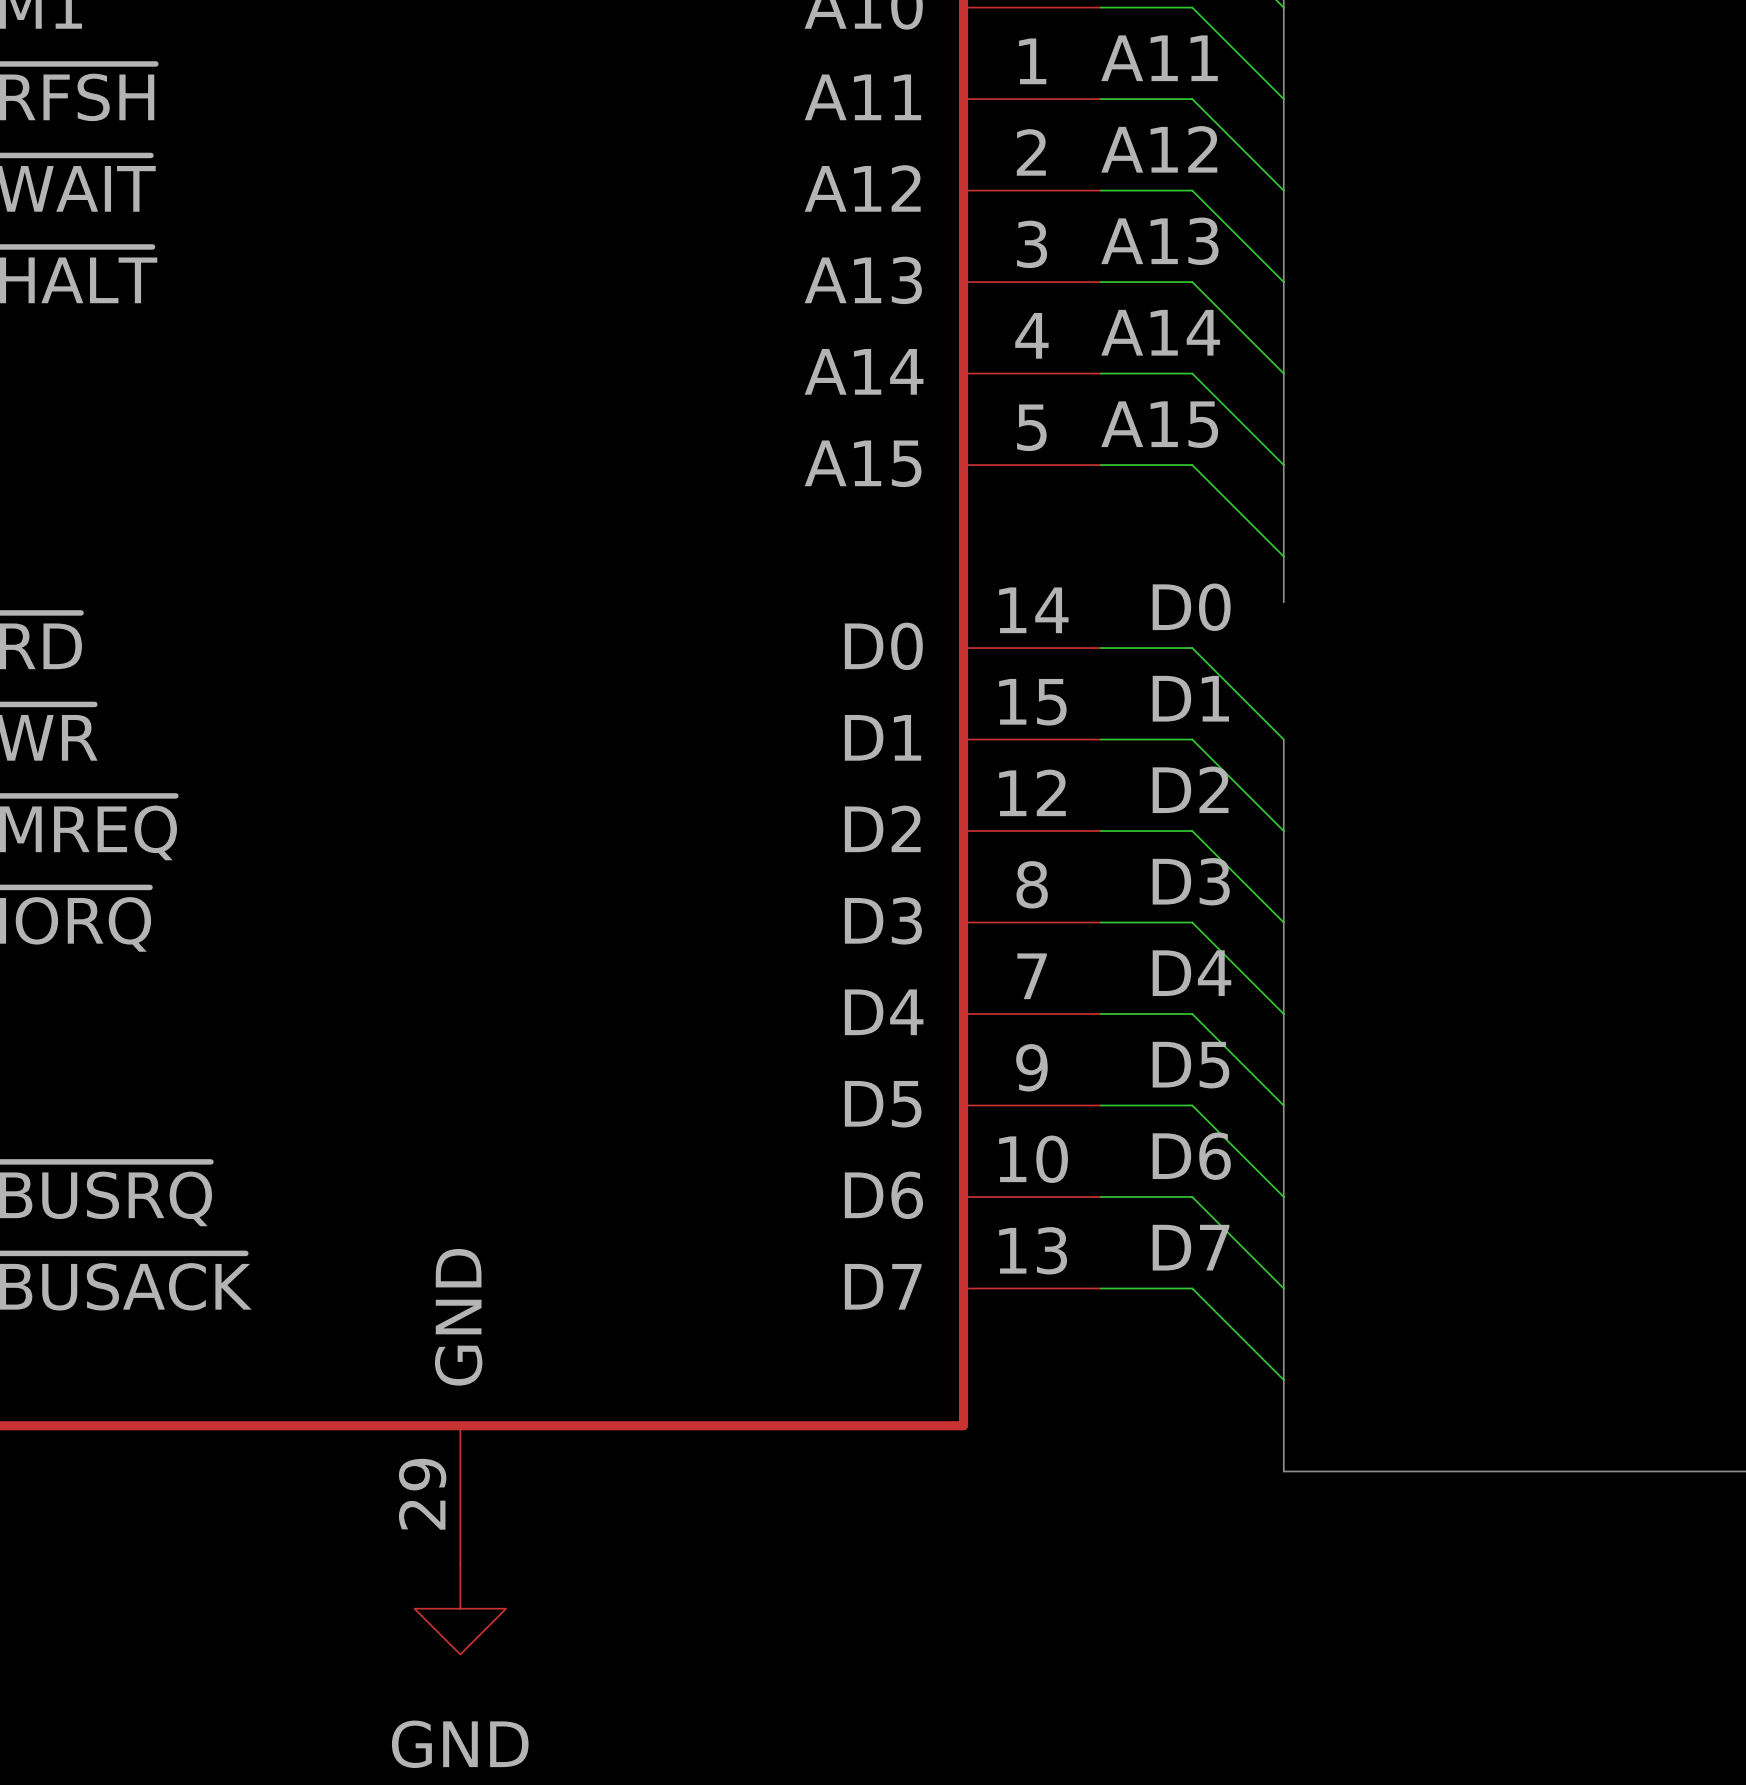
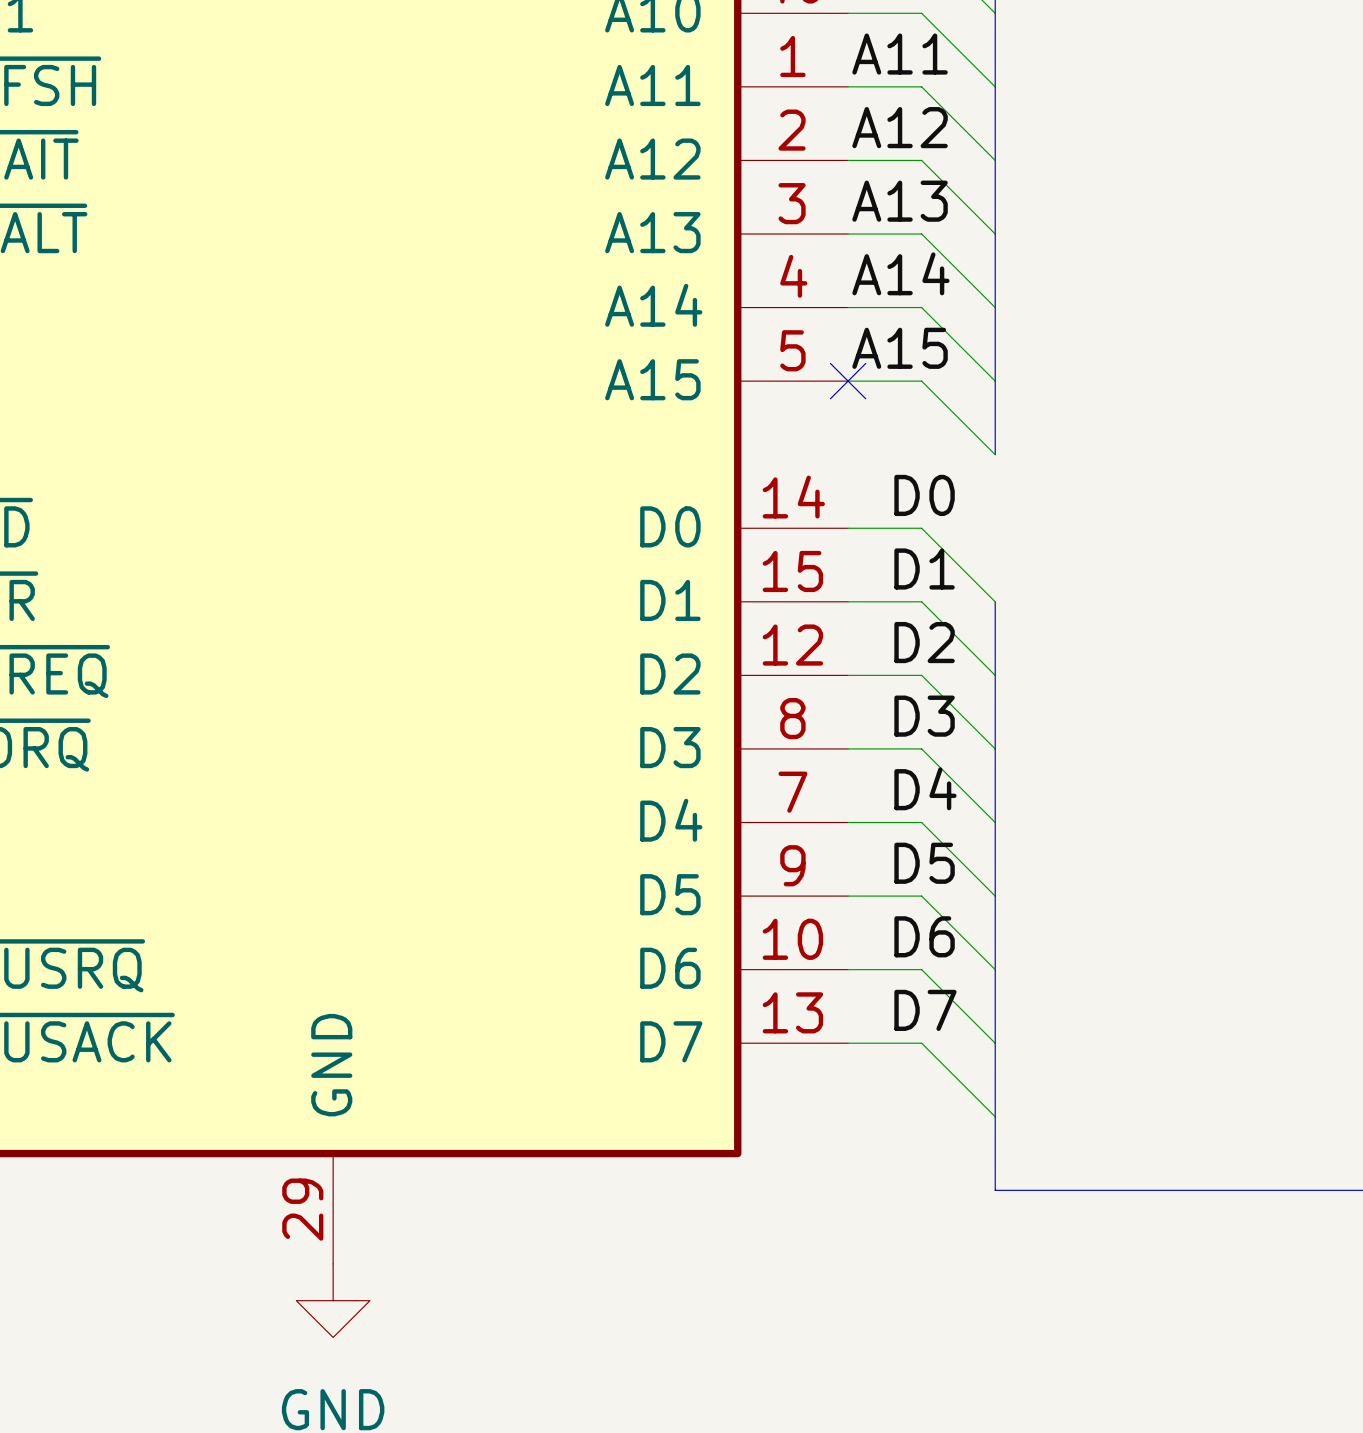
no-connect mark: none -> (848, 381)
bus: (1283, 556) (1283, 602) -> none

